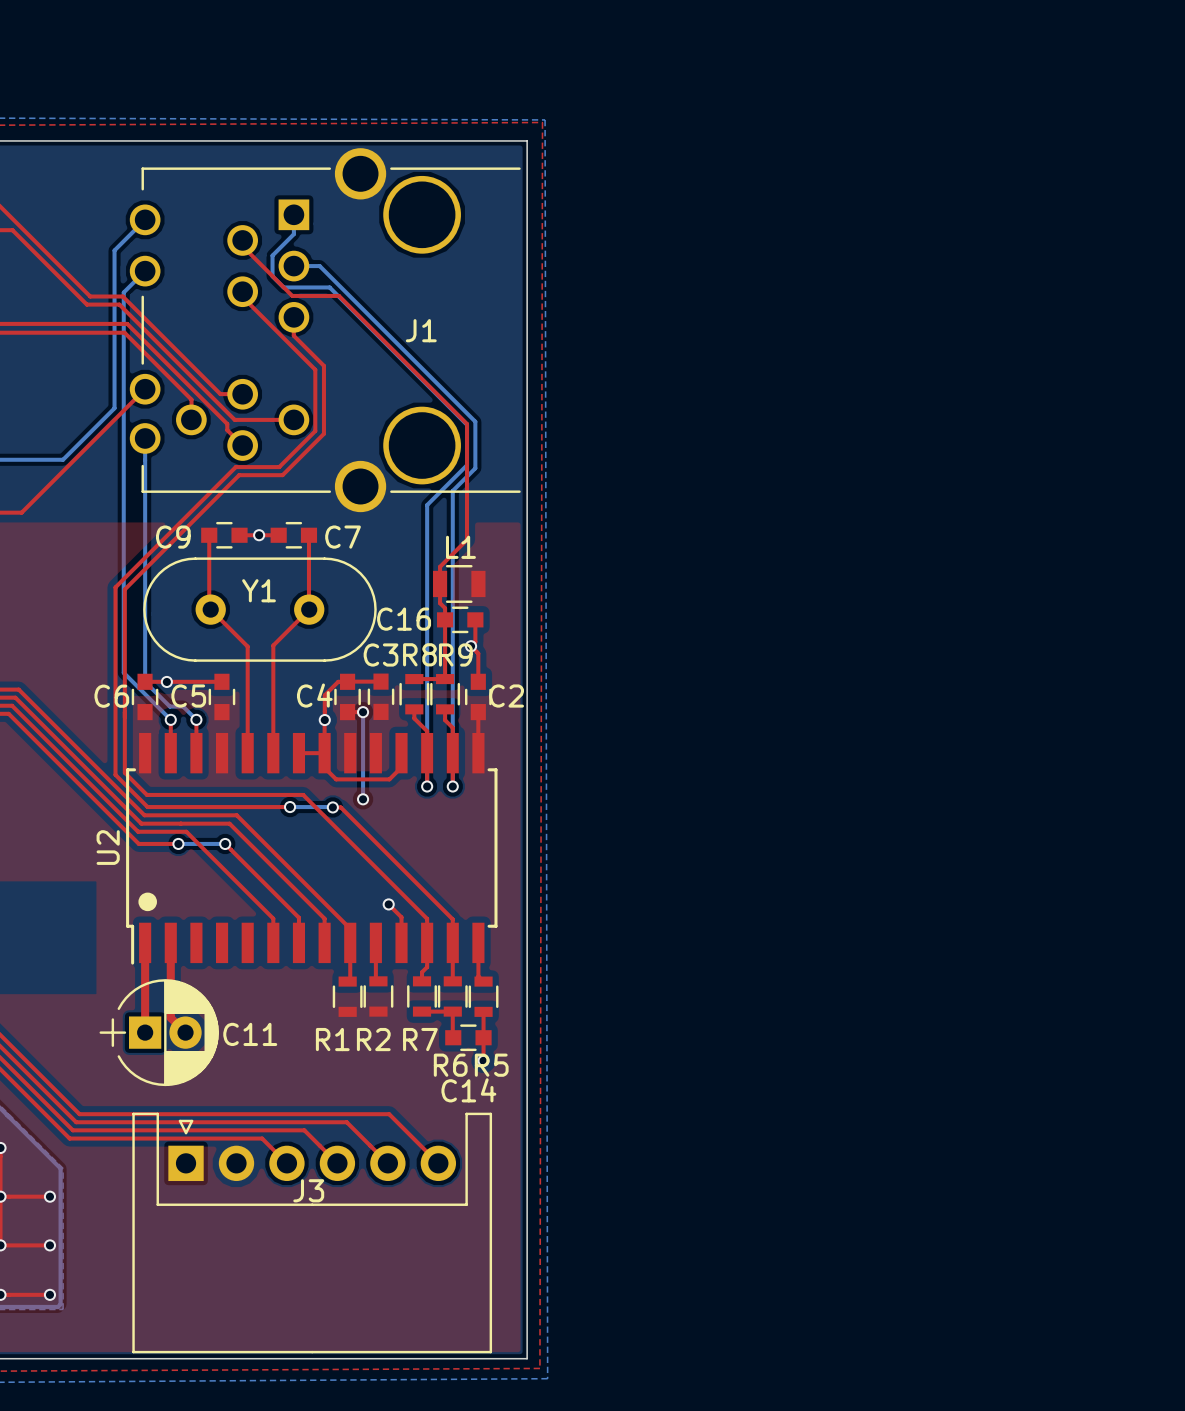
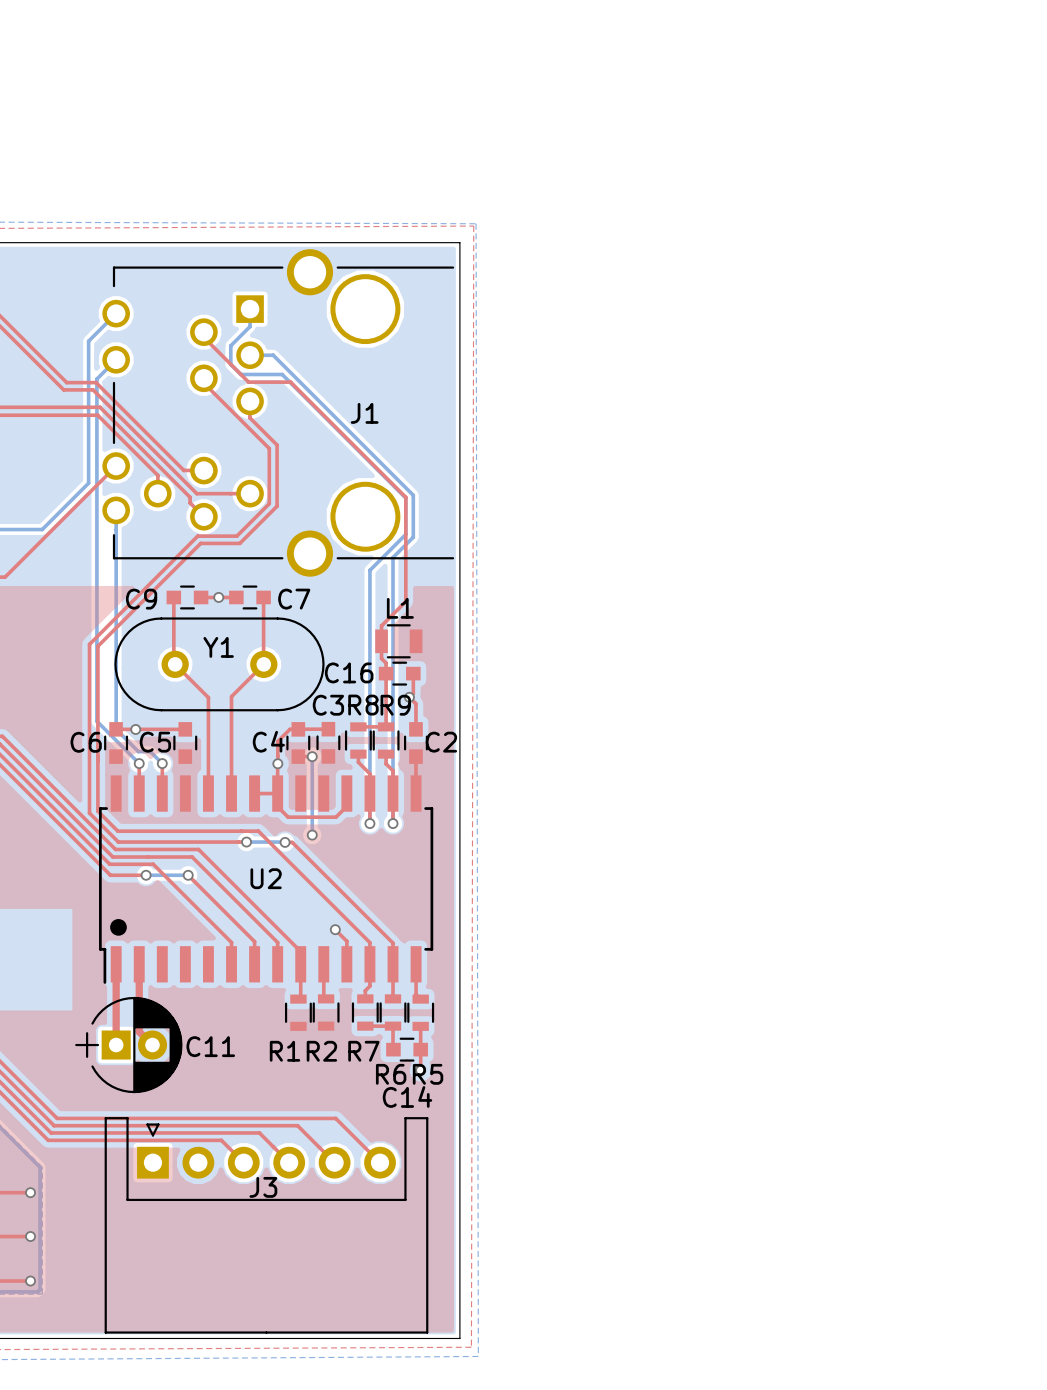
U2 name rotation: 0° (108, 847) -> 90° clockwise (266, 878)
U2 name position: U2 (108, 847) -> U2 (266, 878)

